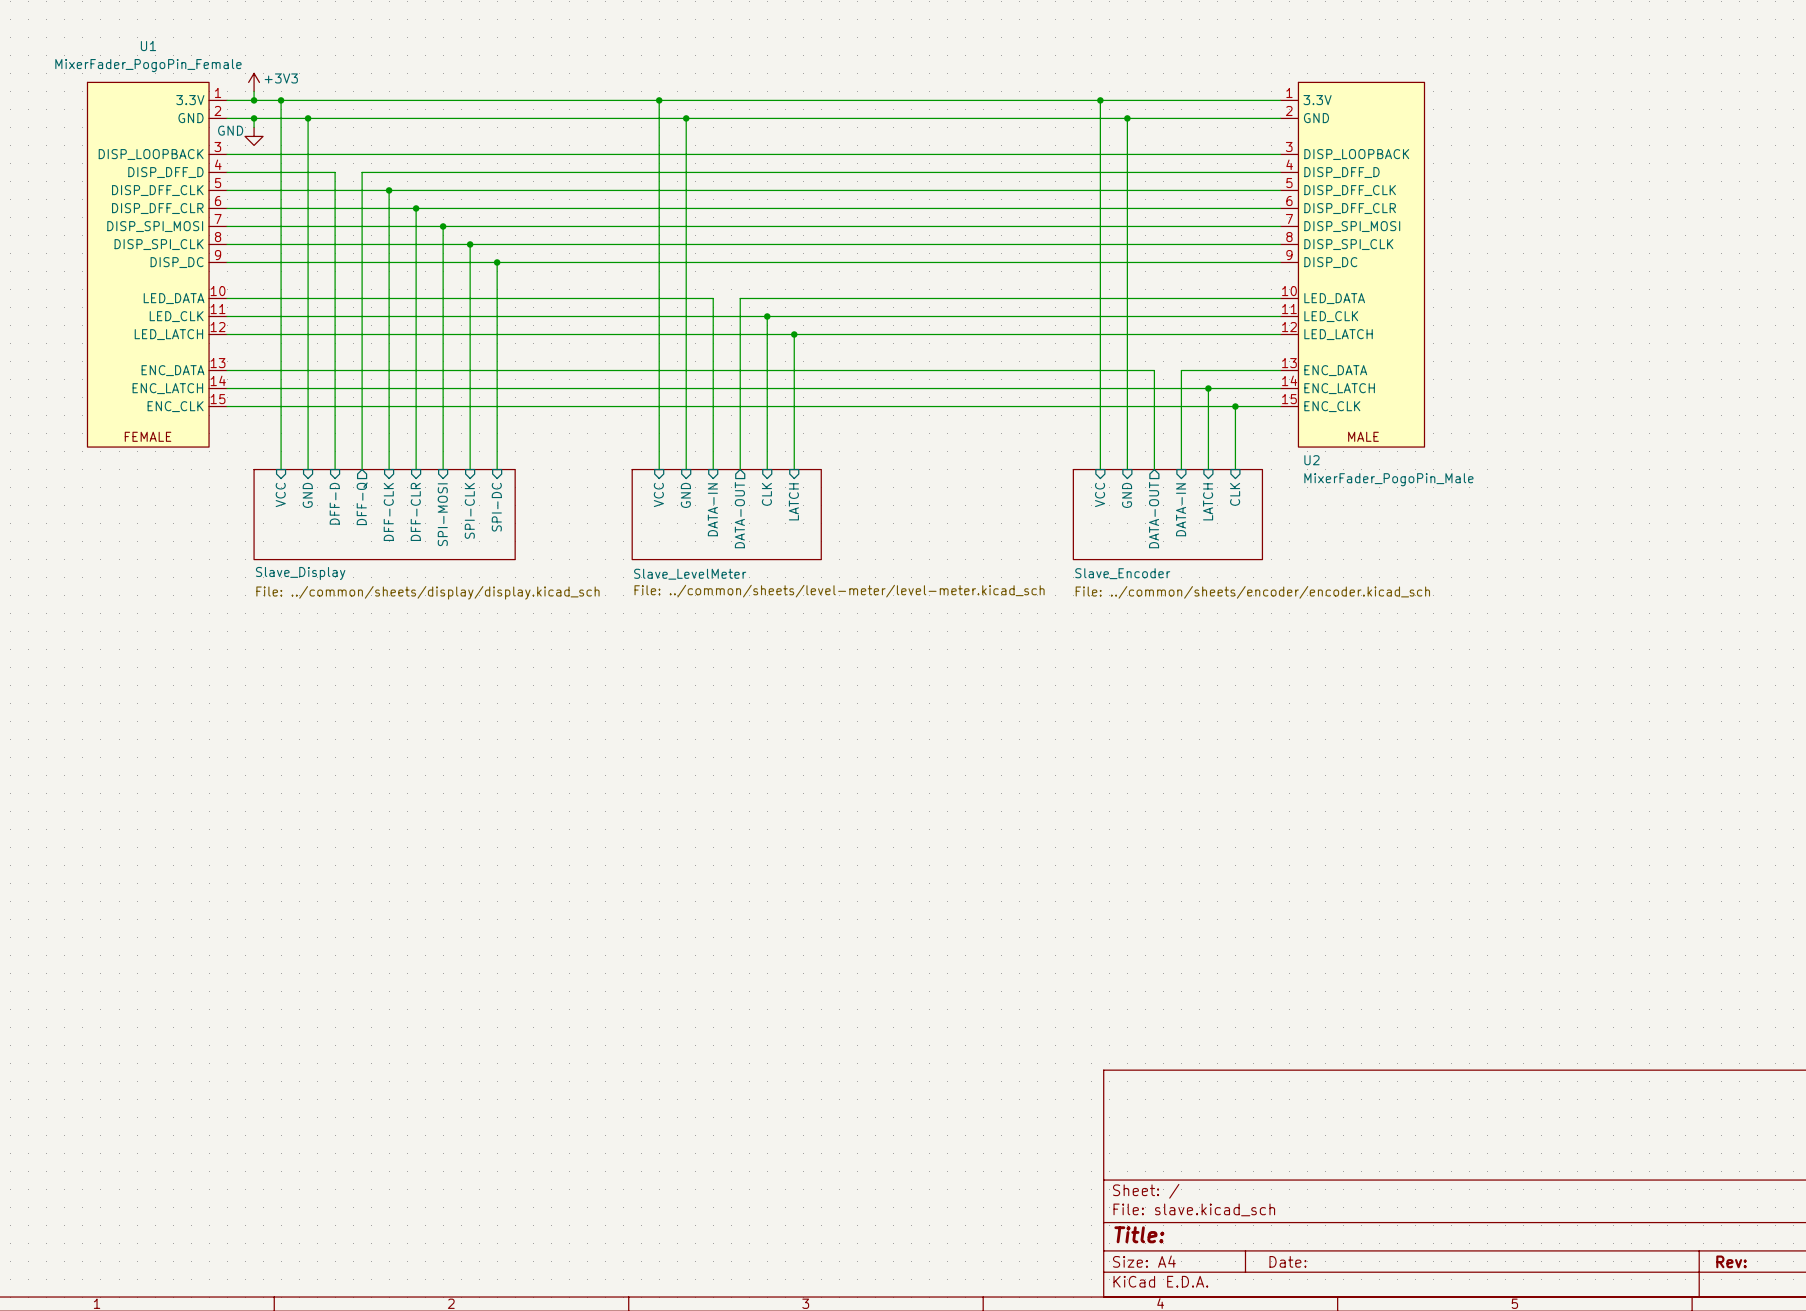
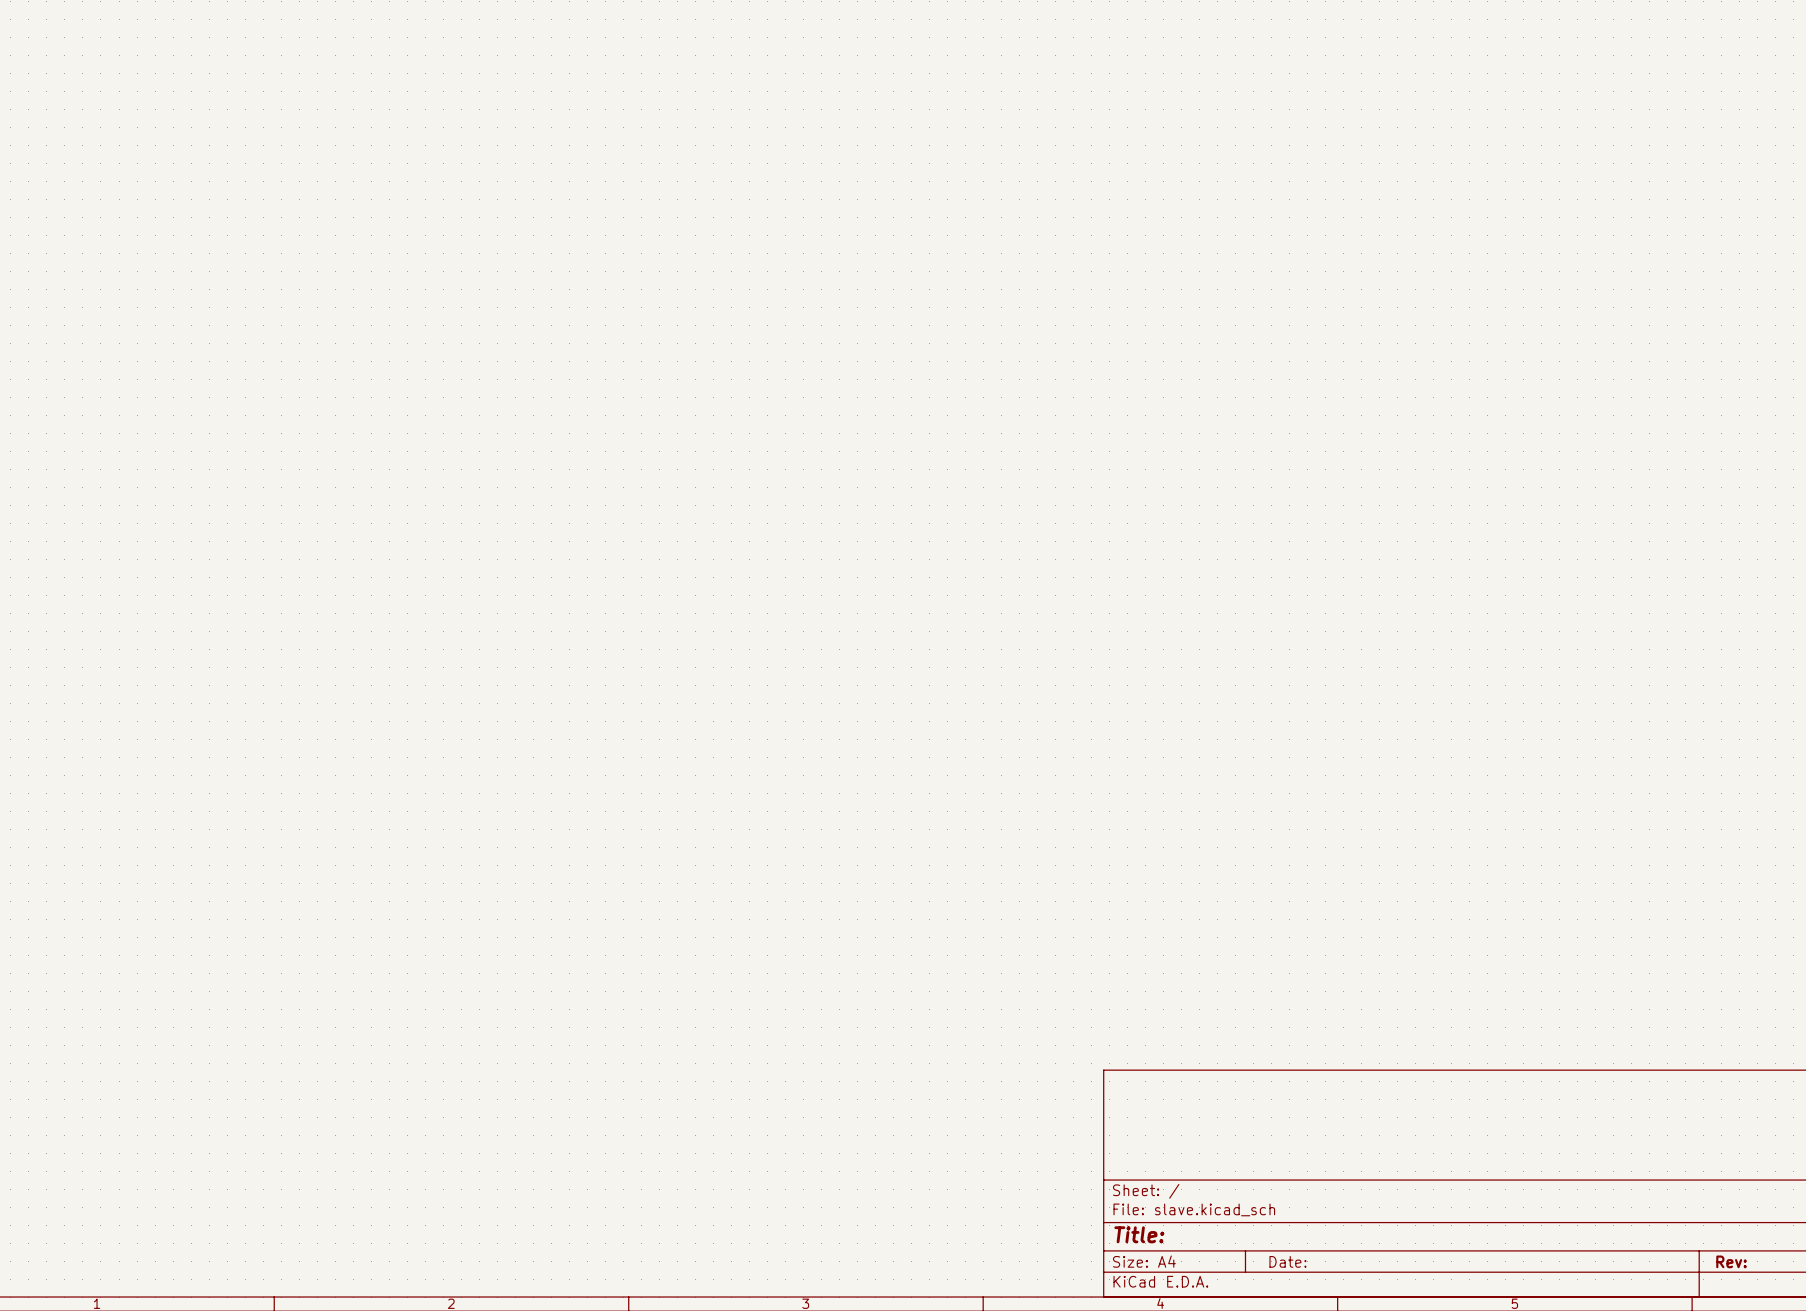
power symbol: +3V3 (254, 82) -> none
wire: (254, 91) (254, 100) -> none
wire: (227, 100) (1280, 100) -> none
junction: (254, 100) -> none
wire: (281, 100) (281, 469) -> none
junction: (281, 100) -> none
wire: (659, 100) (659, 469) -> none
junction: (659, 100) -> none
wire: (1100, 100) (1100, 469) -> none
junction: (1100, 100) -> none
wire: (227, 118) (1280, 118) -> none
wire: (254, 118) (254, 127) -> none
junction: (254, 118) -> none
wire: (308, 118) (308, 469) -> none
junction: (308, 118) -> none
wire: (686, 118) (686, 469) -> none
junction: (686, 118) -> none
wire: (1127, 118) (1127, 469) -> none
junction: (1127, 118) -> none
power symbol: GND (254, 136) -> none
wire: (227, 154) (1280, 154) -> none
wire: (227, 172) (335, 172) (335, 469) -> none
wire: (1280, 172) (362, 172) (362, 469) -> none
wire: (227, 190) (1280, 190) -> none
wire: (389, 190) (389, 469) -> none
junction: (389, 190) -> none
wire: (227, 208) (1280, 208) -> none
wire: (416, 208) (416, 469) -> none
junction: (416, 208) -> none
wire: (227, 226) (1280, 226) -> none
wire: (443, 226) (443, 469) -> none
junction: (443, 226) -> none
wire: (227, 244) (1280, 244) -> none
wire: (470, 244) (470, 469) -> none
junction: (470, 244) -> none
wire: (227, 262) (1280, 262) -> none
wire: (497, 262) (497, 469) -> none
junction: (497, 262) -> none
U1: MixerFader_PogoPin_Female (157, 264) -> none
U2: MixerFader_PogoPin_Male (1352, 264) -> none
wire: (227, 298) (713, 298) (713, 469) -> none
wire: (1280, 298) (740, 298) (740, 469) -> none
wire: (227, 316) (1280, 316) -> none
wire: (767, 316) (767, 469) -> none
junction: (767, 316) -> none
wire: (227, 334) (1280, 334) -> none
wire: (794, 334) (794, 469) -> none
junction: (794, 334) -> none
wire: (227, 370) (1154, 370) (1154, 469) -> none
wire: (1280, 370) (1181, 370) (1181, 469) -> none
wire: (227, 388) (1280, 388) -> none
wire: (1208, 388) (1208, 469) -> none
junction: (1208, 388) -> none
wire: (227, 406) (1280, 406) -> none
wire: (1235, 406) (1235, 469) -> none
junction: (1235, 406) -> none
sheet pin: VCC (280, 494) -> none
sheet pin: VCC (658, 494) -> none
sheet pin: CLK (766, 494) -> none
sheet pin: VCC (1100, 494) -> none
sheet pin: CLK (1235, 494) -> none
sheet pin: GND (307, 495) -> none
sheet pin: GND (685, 495) -> none
sheet pin: GND (1127, 495) -> none
sheet pin: LATCH (793, 501) -> none
sheet pin: LATCH (1208, 501) -> none
sheet pin: DFF-D (334, 503) -> none
sheet pin: DFF-Q (362, 503) -> none
sheet pin: SPI-DC (496, 507) -> none
sheet pin: DATA-IN (712, 509) -> none
sheet pin: DATA-IN (1181, 509) -> none
sheet pin: SPI-CLK (469, 510) -> none
sheet pin: DFF-CLK (388, 511) -> none
sheet pin: DFF-CLR (415, 511) -> none
sheet Slave_Display: File: ../common/sheets/display/display.kicad_sch (384, 514) -> none
sheet pin: SPI-MOSI (442, 514) -> none
sheet Slave_LevelMeter: File: ../common/sheets/level-meter/level-meter.kicad_sch (726, 514) -> none
sheet Slave_Encoder: File: ../common/sheets/encoder/encoder.kicad_sch (1167, 514) -> none
sheet pin: DATA-OUT (739, 515) -> none
sheet pin: DATA-OUT (1154, 515) -> none

